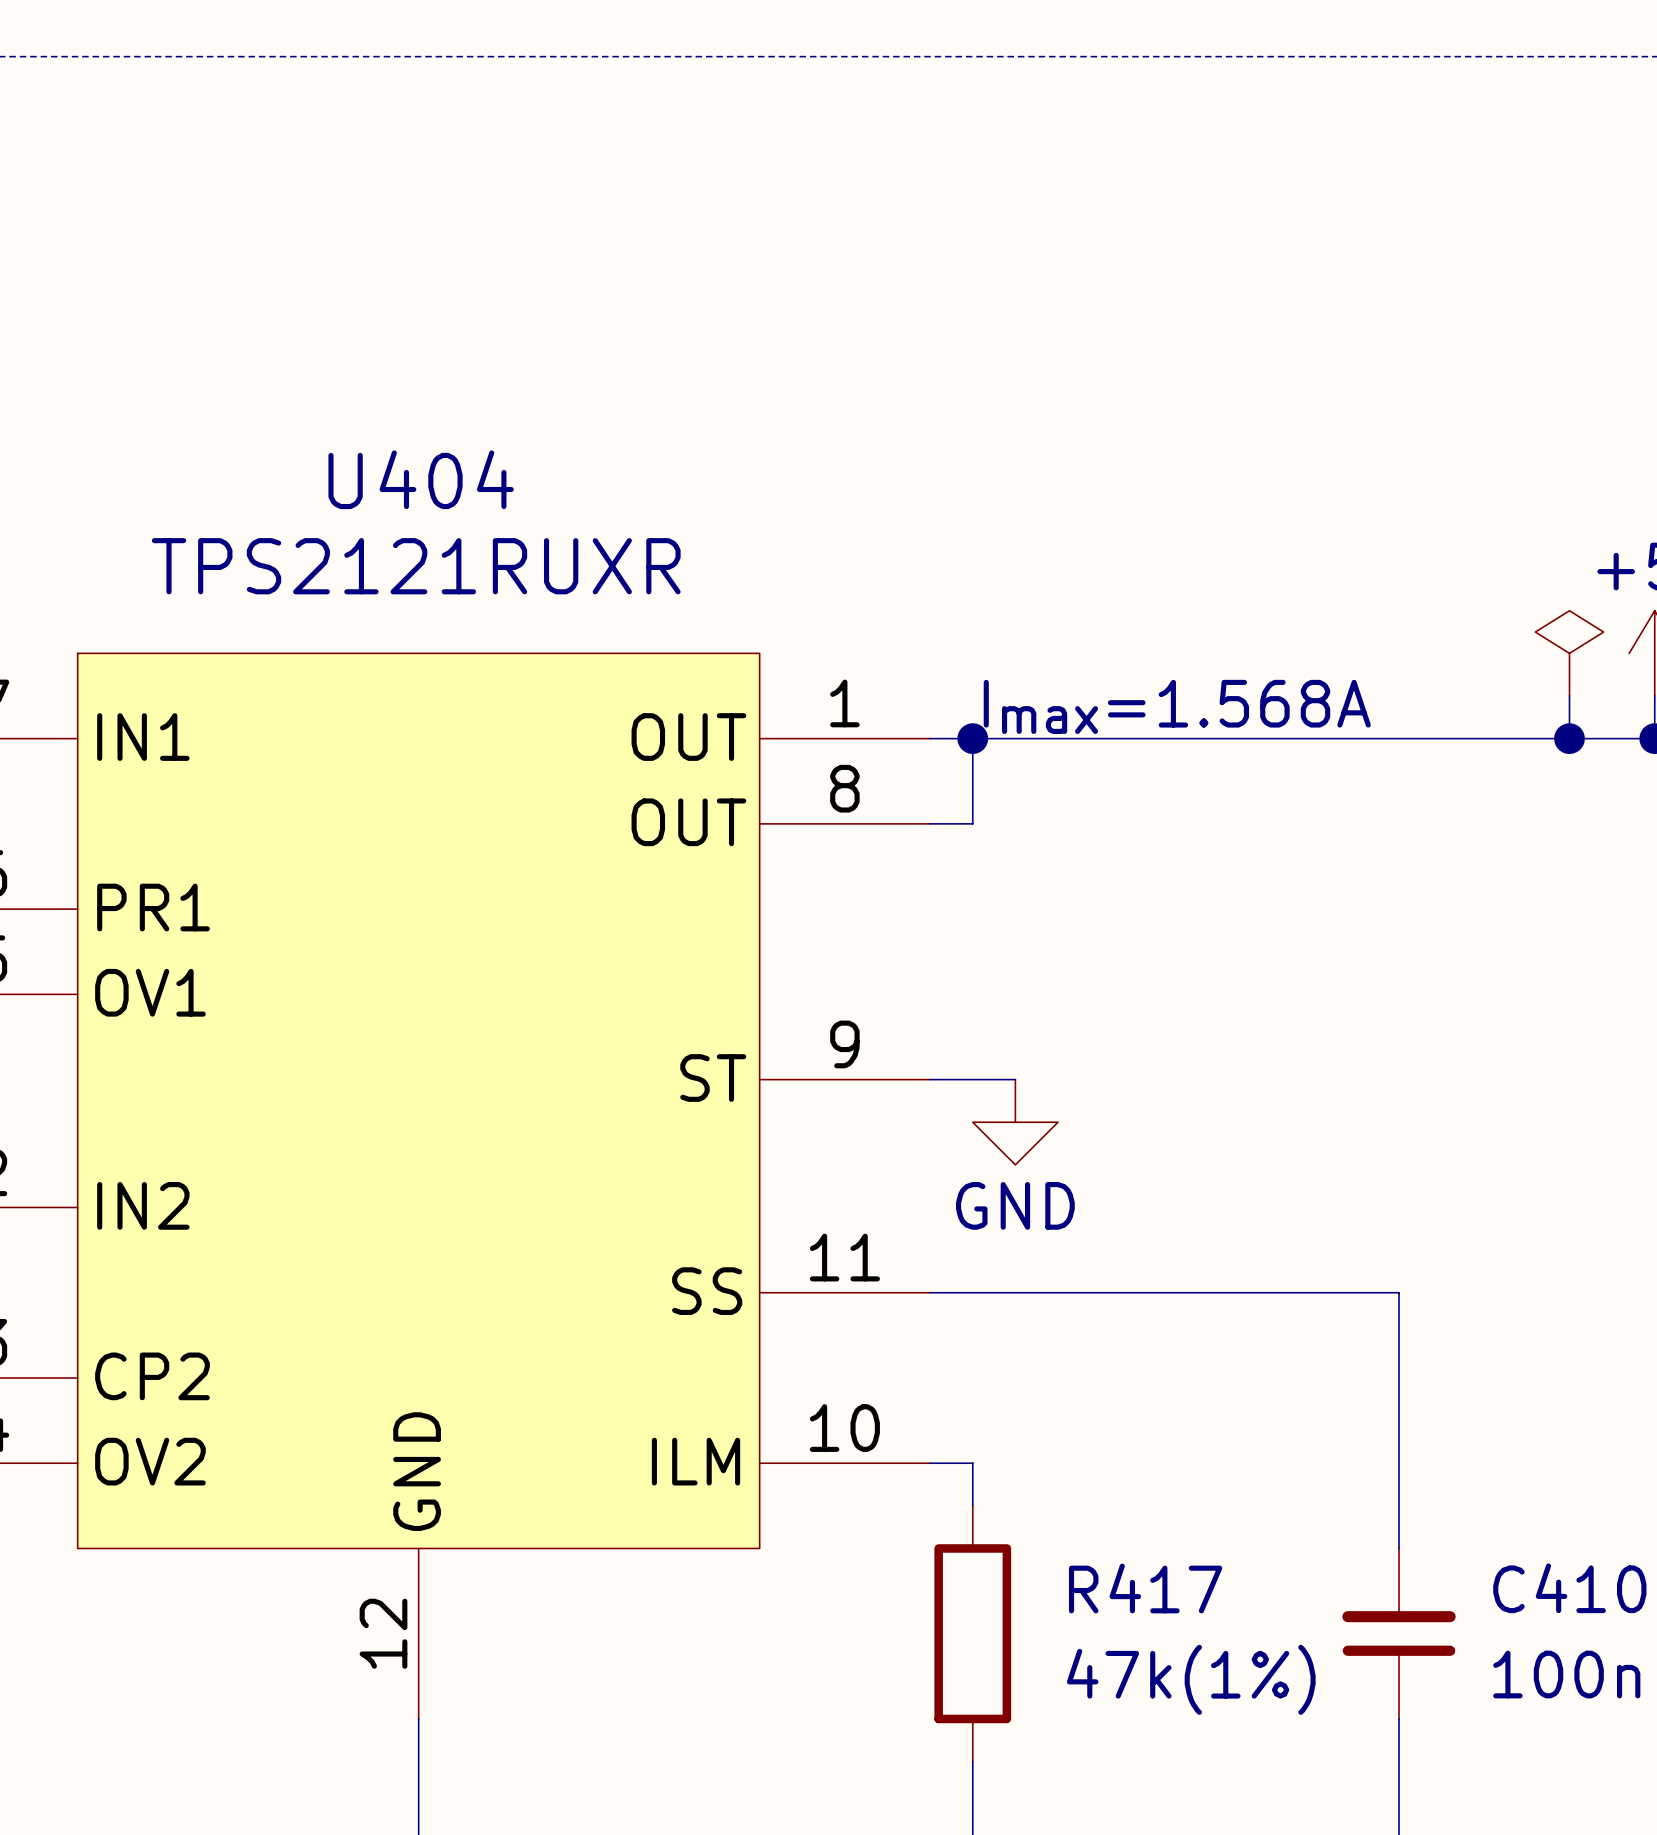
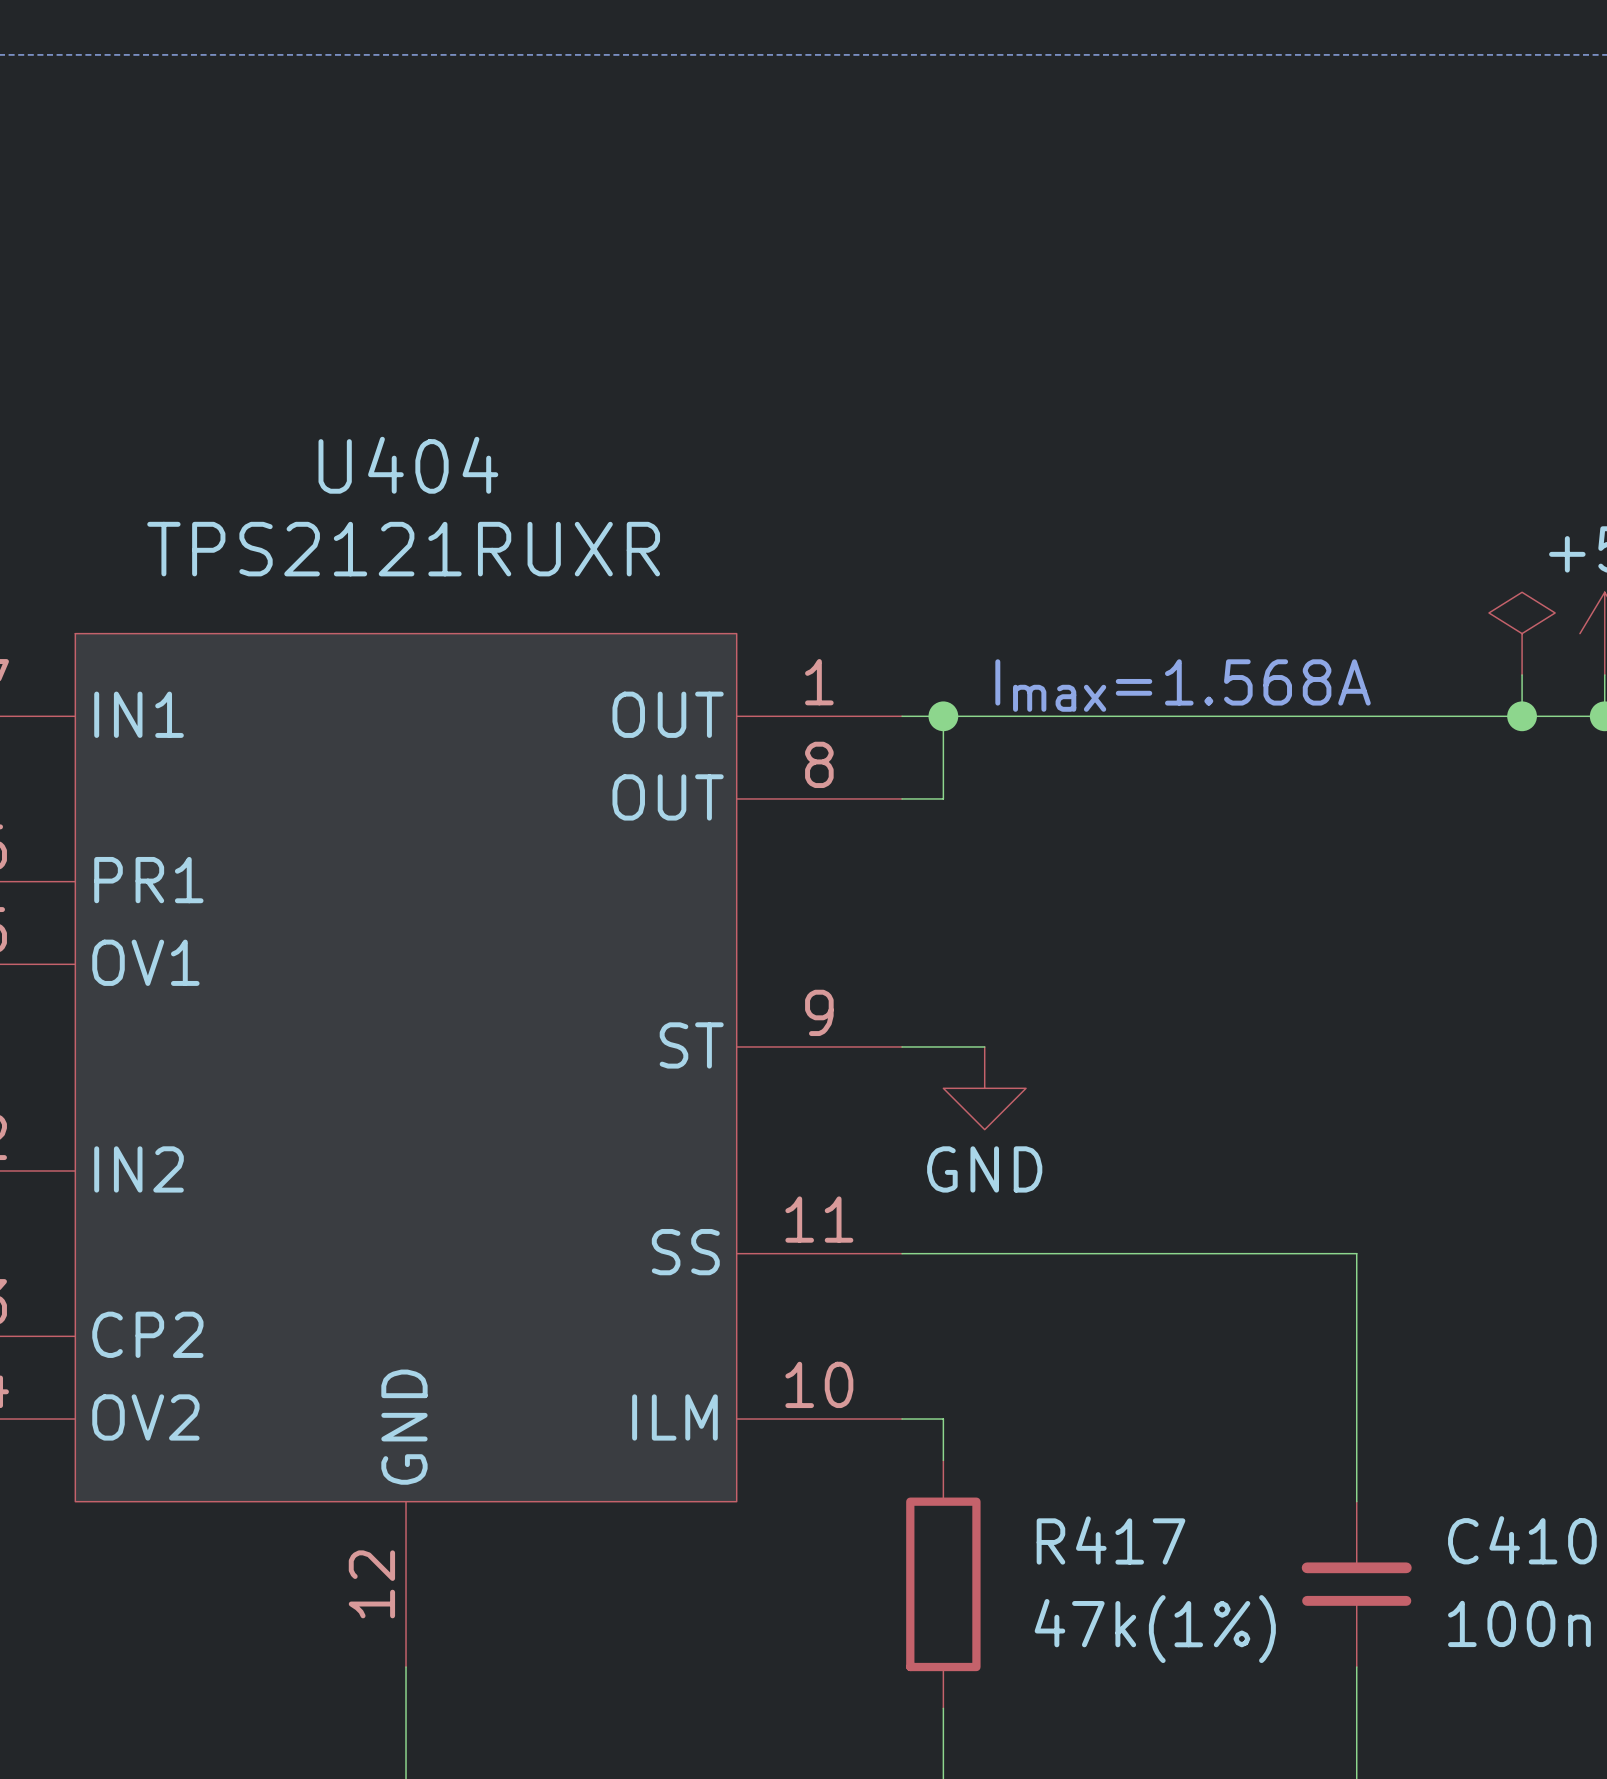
text position: Imax=1.568A (1177, 706) -> Imax=1.568A (1183, 685)

